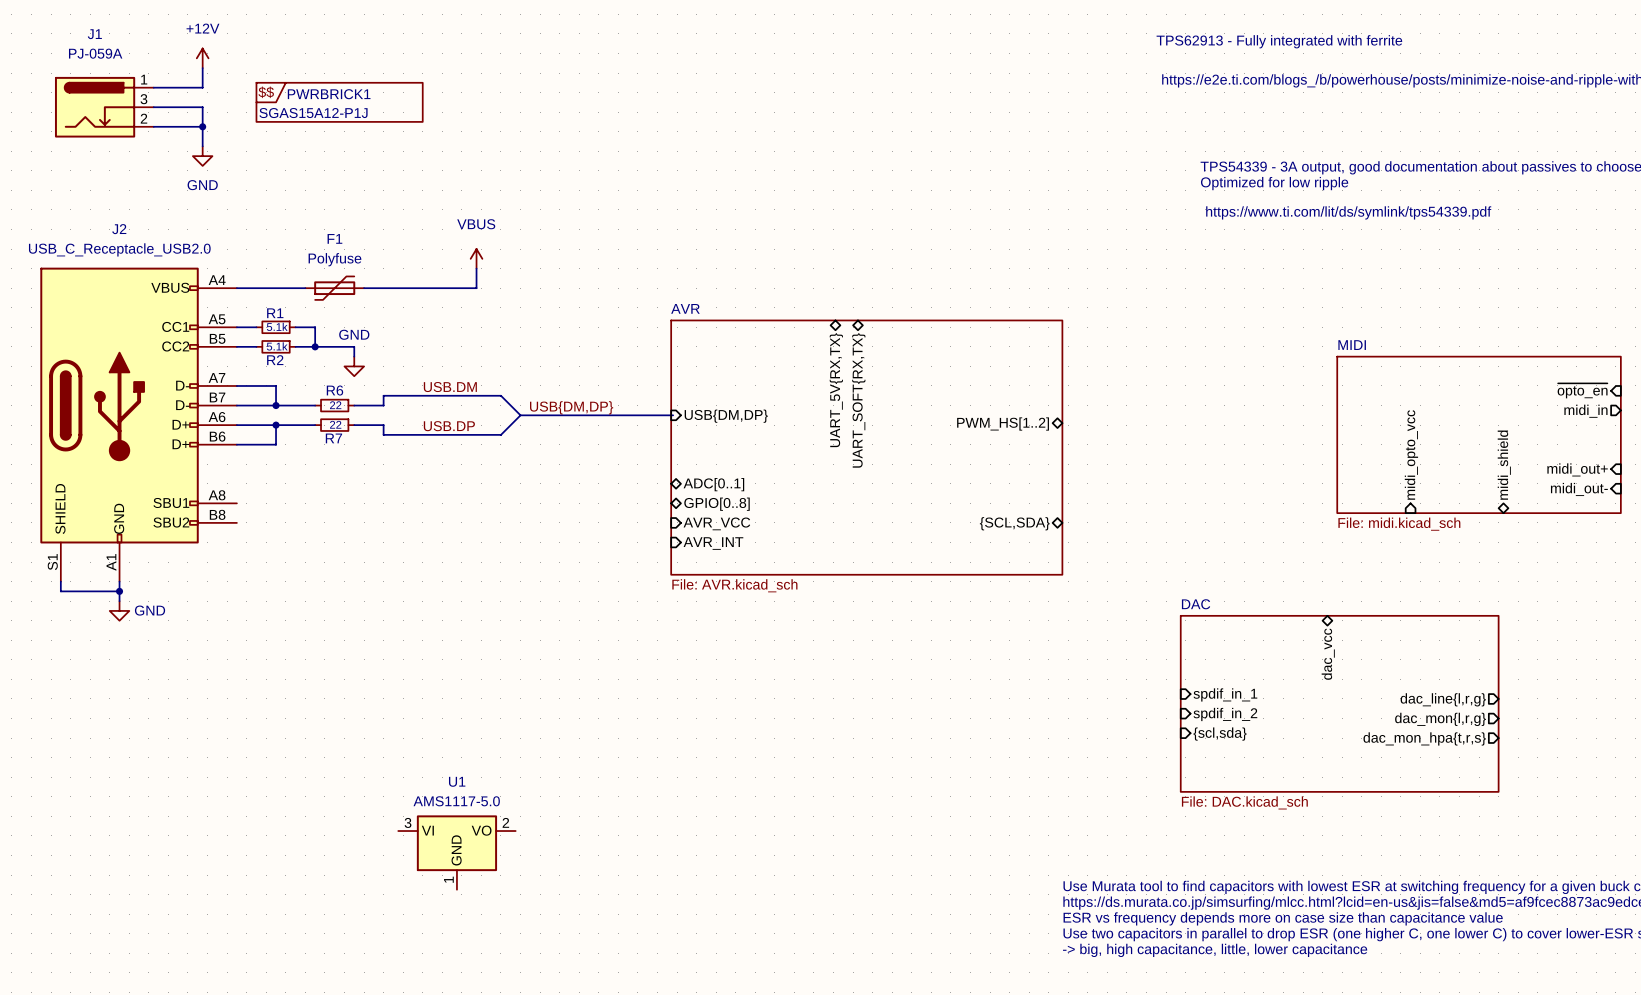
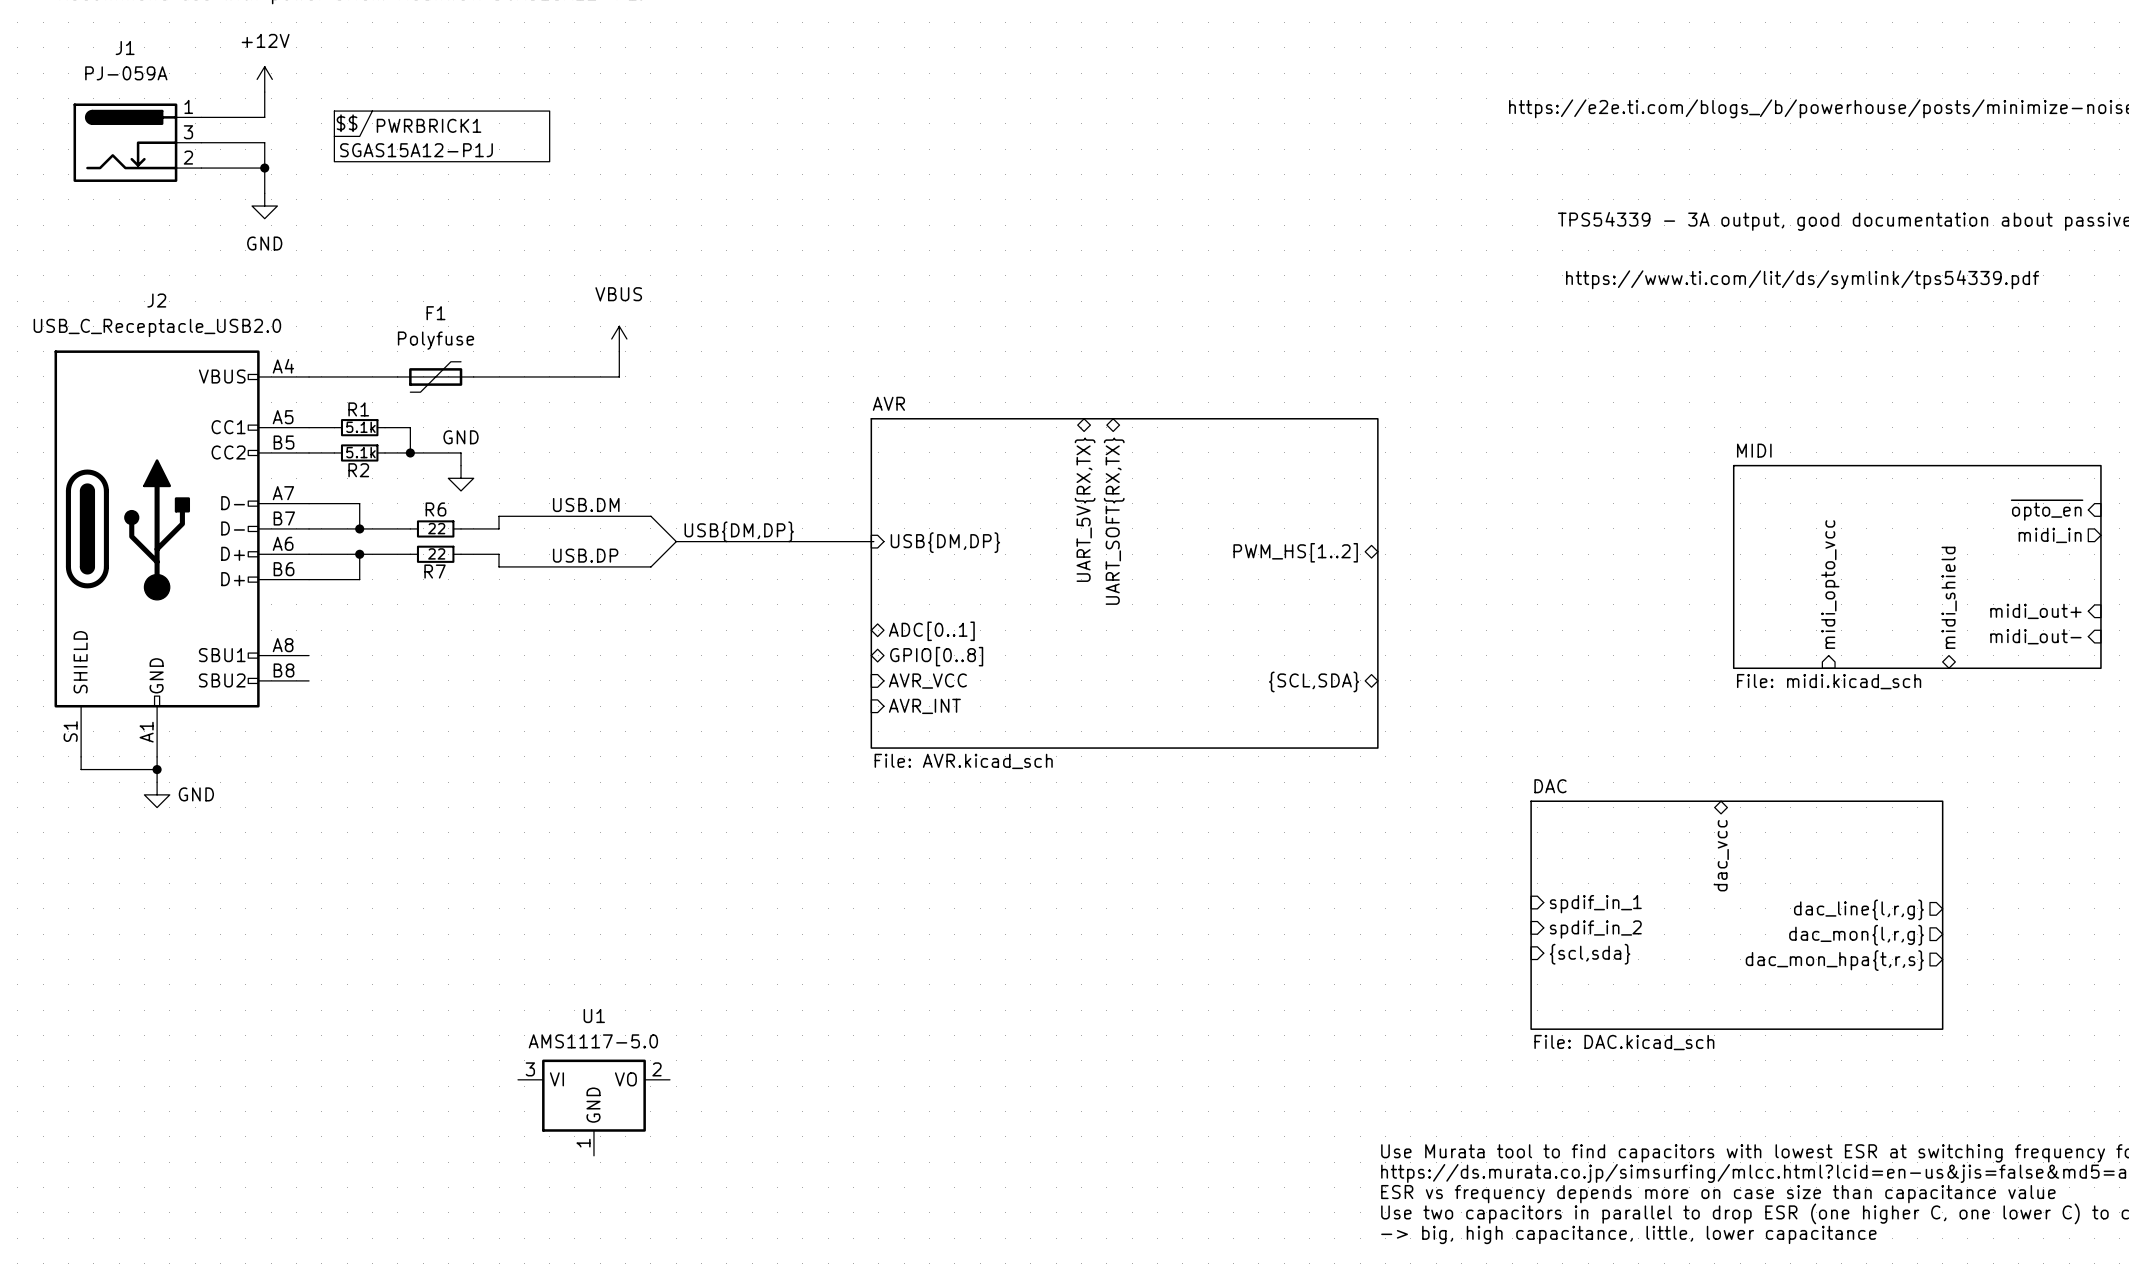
text: TPS62913 - Fully integrated with ferrite (1279, 41) -> none
text: Optimized for low ripple (1274, 183) -> none

